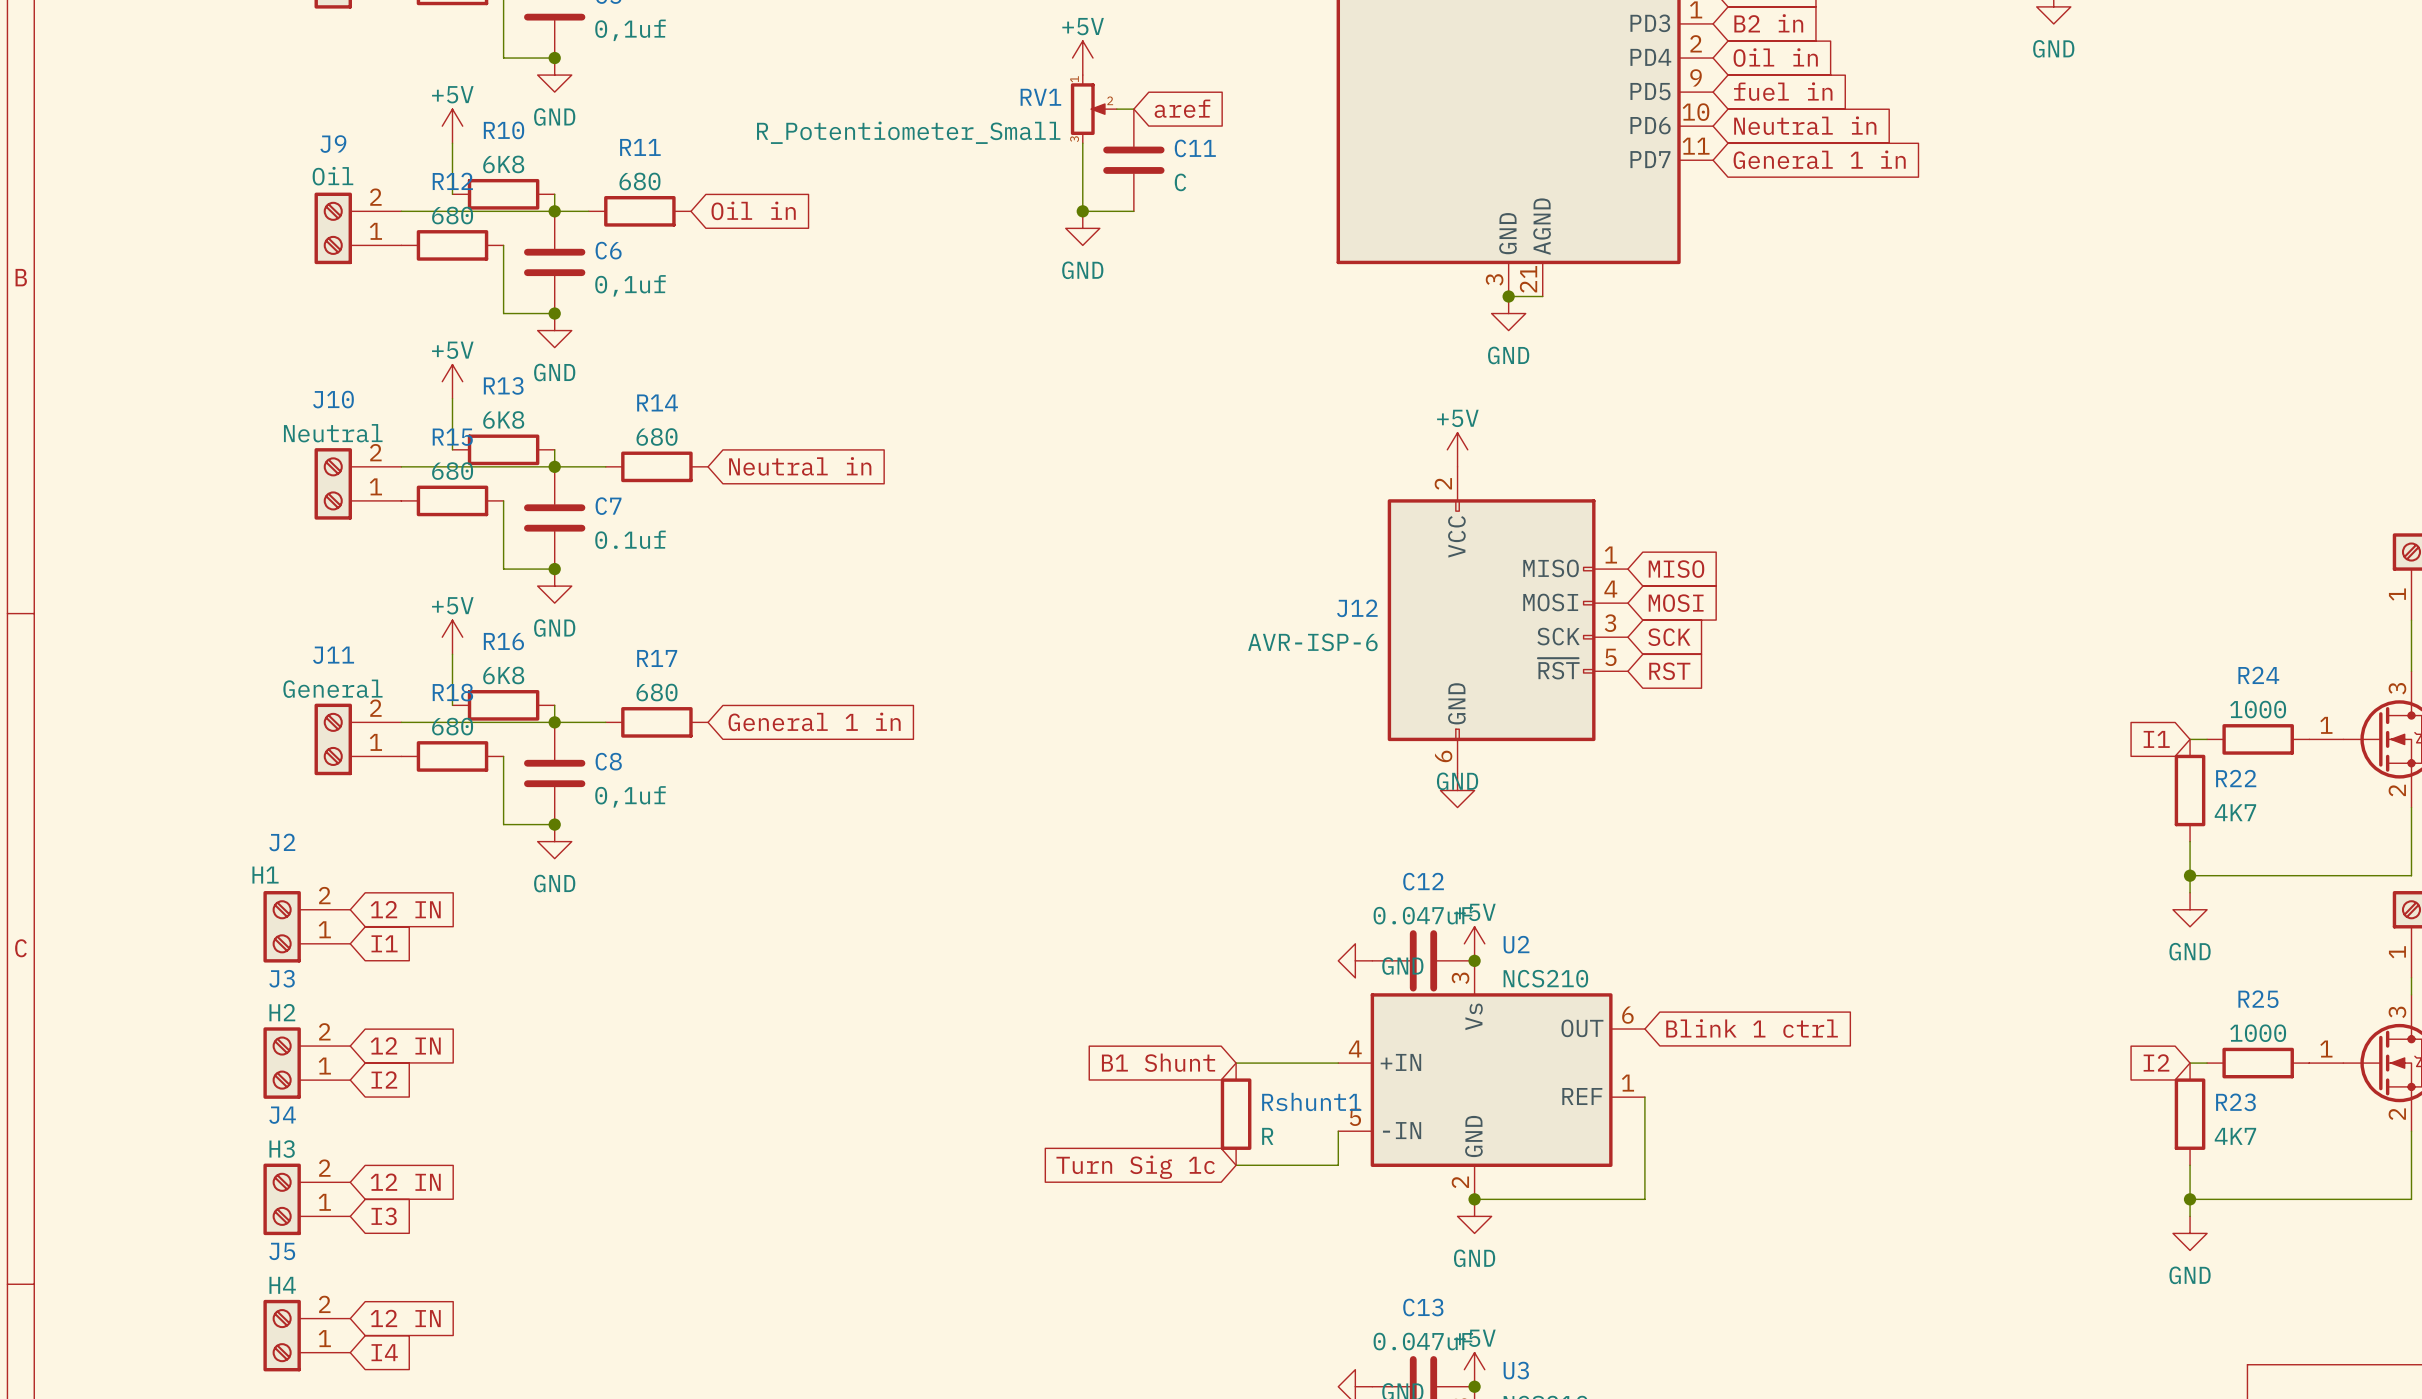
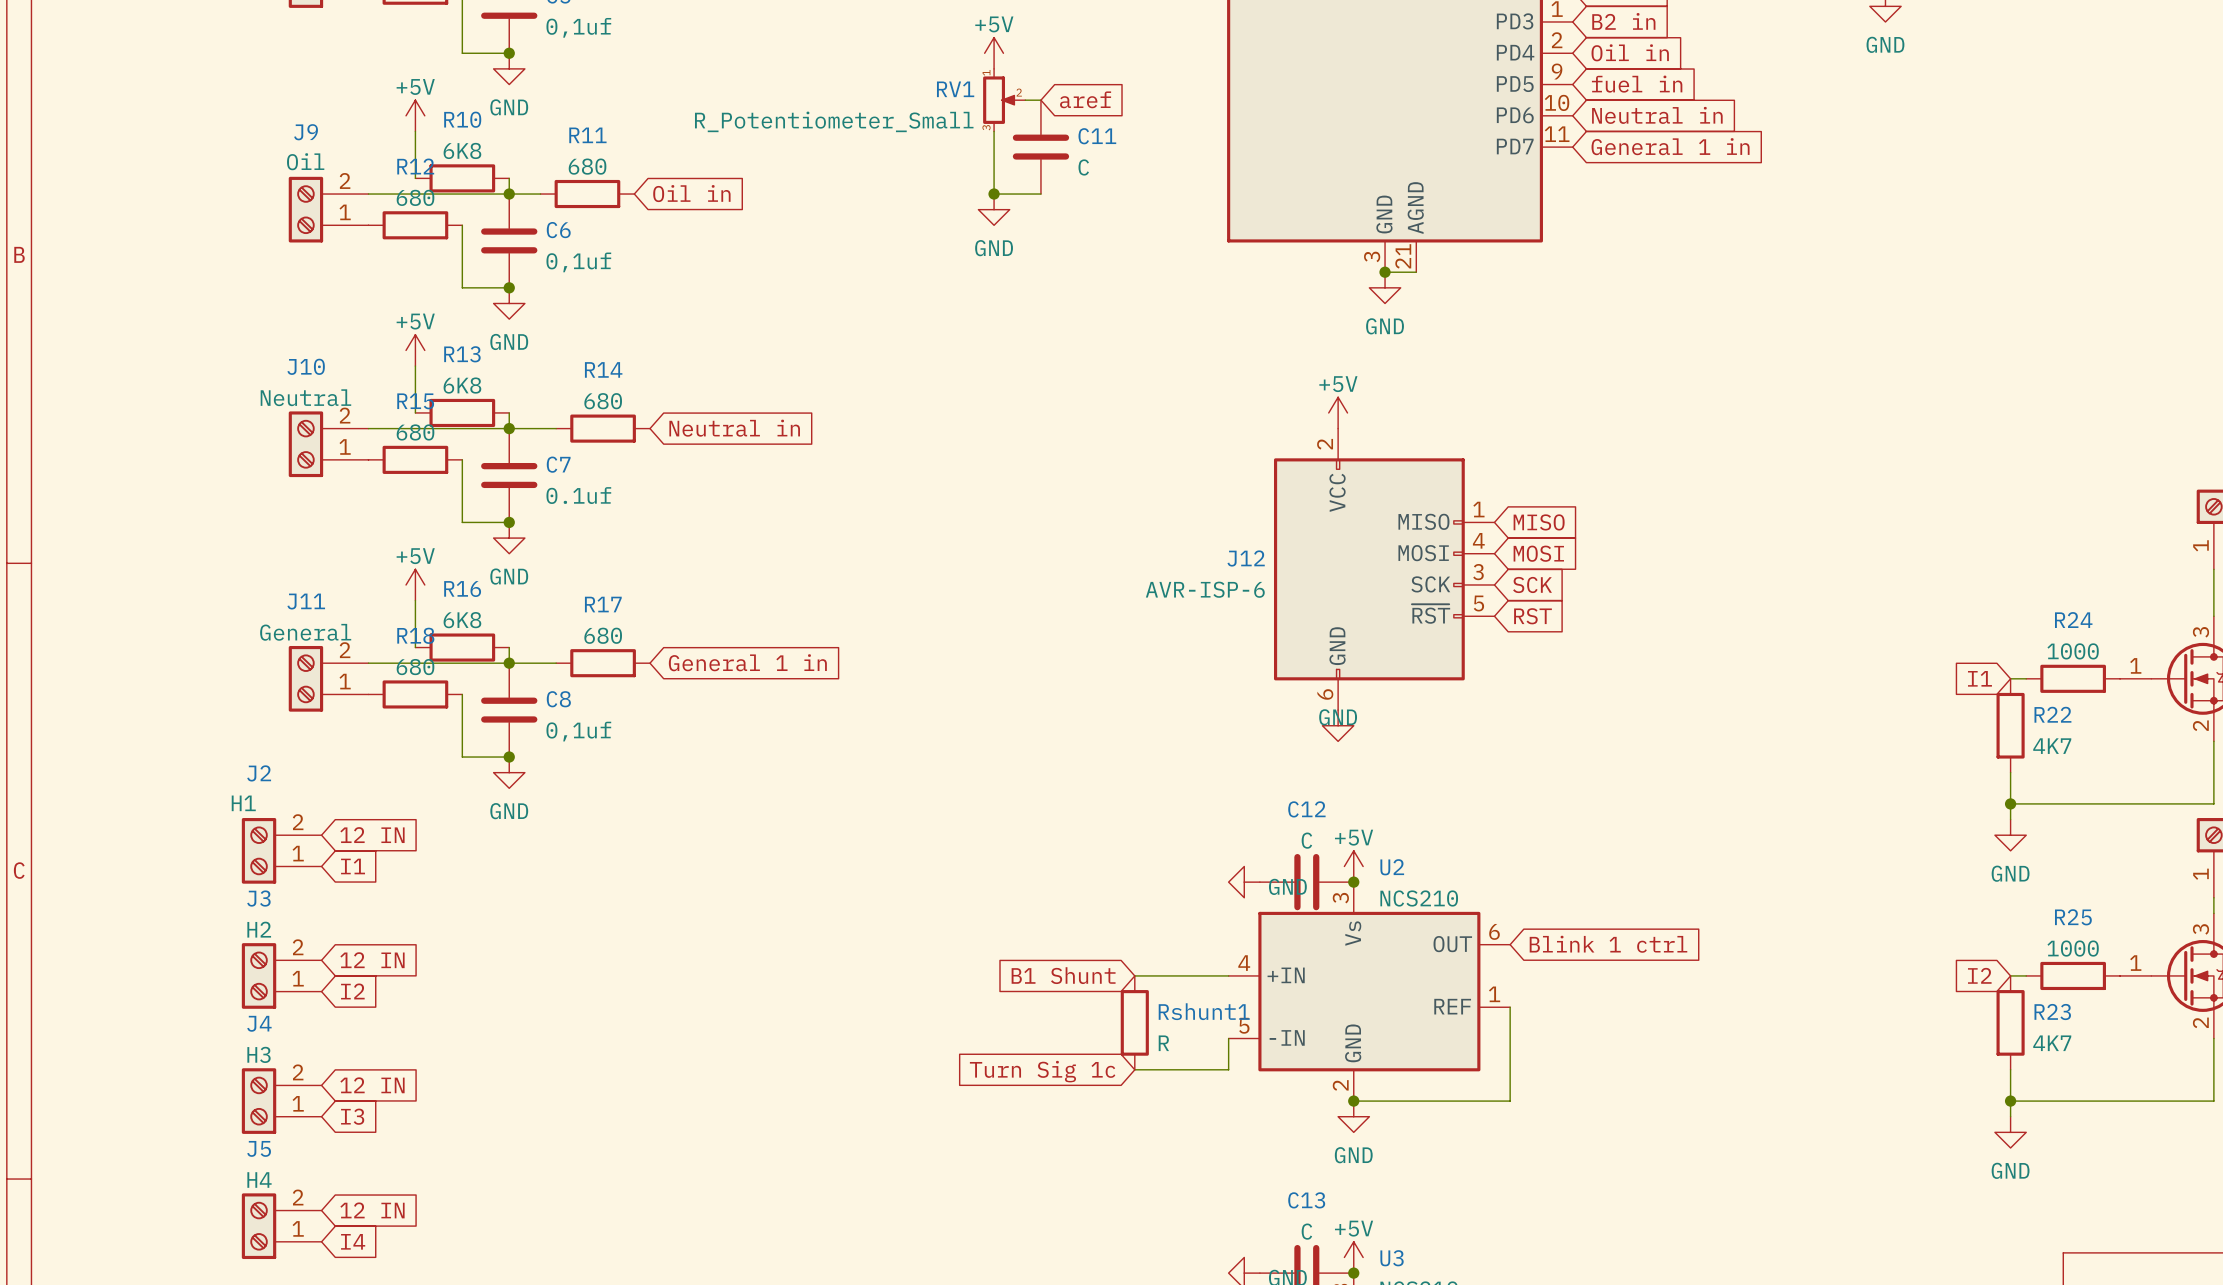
C12 value: 0.047uF (1423, 915) -> C (1306, 840)
C13 value: 0.047uF (1423, 1341) -> C (1306, 1231)

